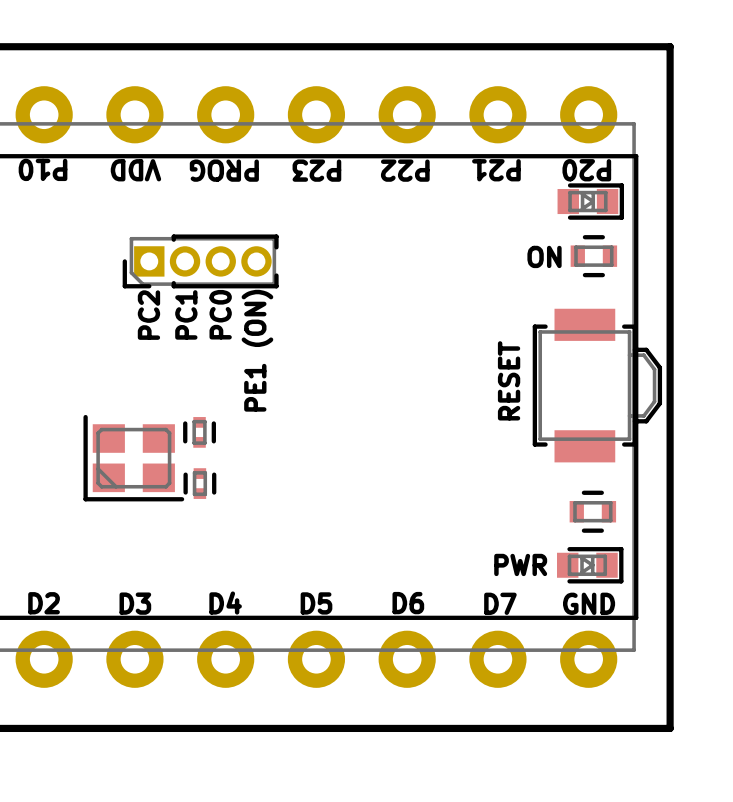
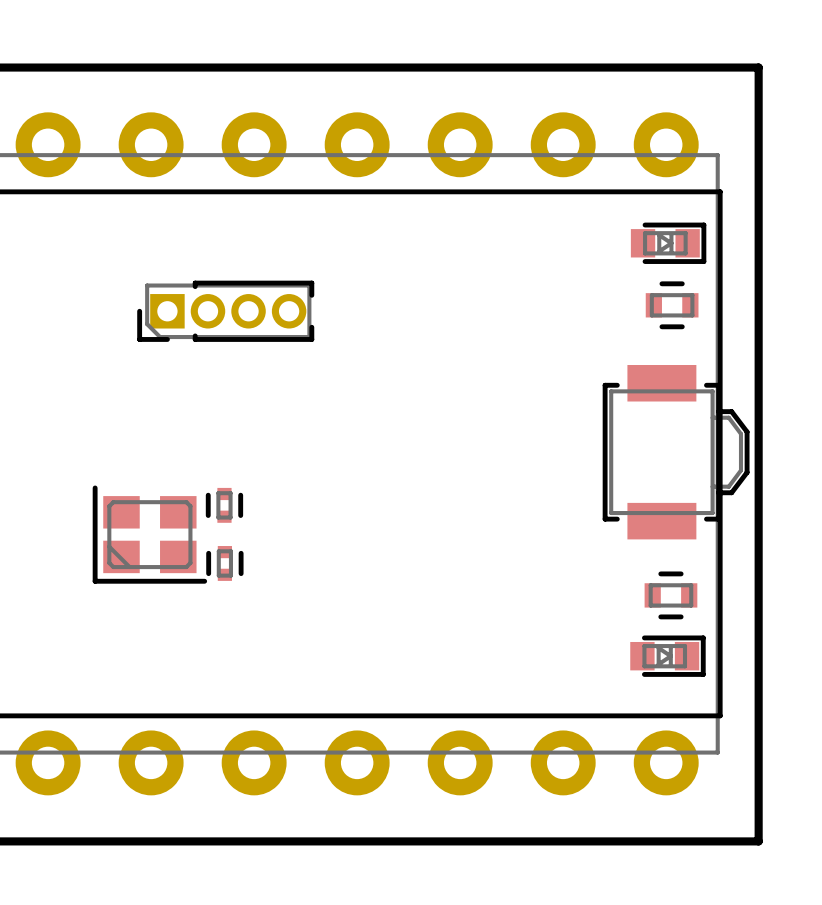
text: P10 (43, 169) -> none
text: VDD (135, 170) -> none
text: PROG (224, 170) -> none
text: P23 (316, 170) -> none
text: P22 (405, 170) -> none
text: P21 (496, 170) -> none
text: P20 (586, 170) -> none
text: ON (544, 256) -> none
text: PC1 (186, 314) -> none
text: PC0 (220, 314) -> none
text: PC2 (148, 315) -> none
text: PE1 (ON) (257, 350) -> none
text: RESET (509, 380) -> none
text: PWR (520, 564) -> none
text: D2 (44, 603) -> none
text: D3 (135, 603) -> none
text: D4 (225, 603) -> none
text: D5 (316, 603) -> none
text: D6 (408, 603) -> none
text: D7 (500, 603) -> none
text: GND (589, 603) -> none

